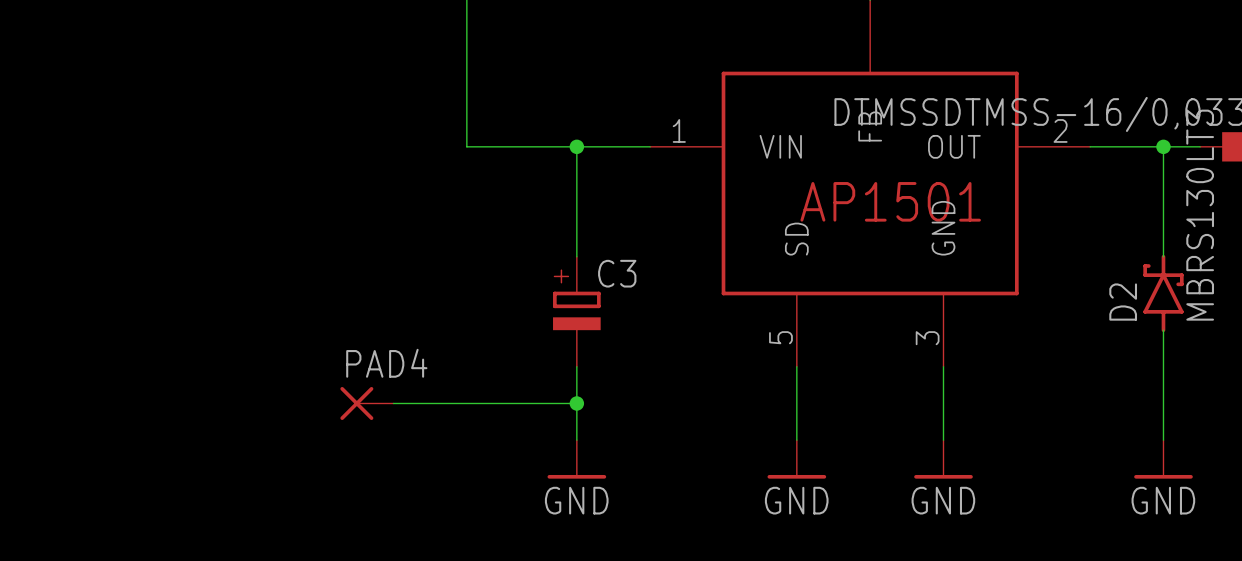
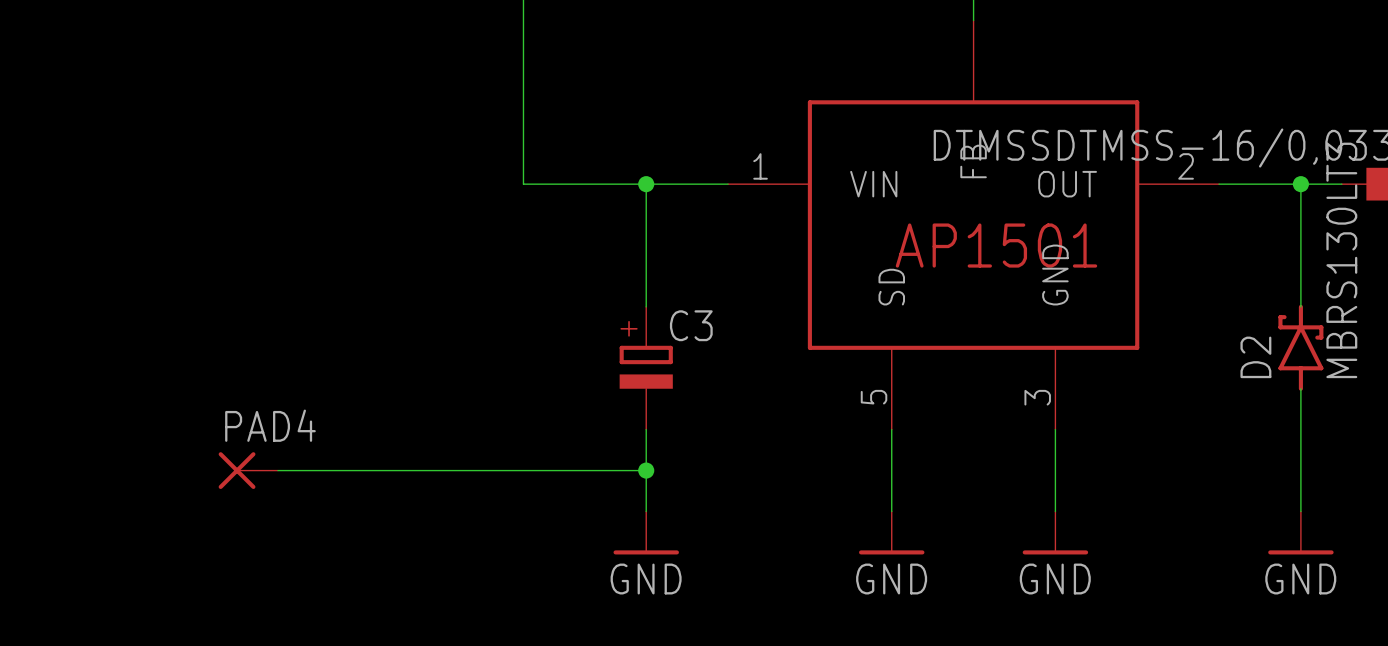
wire: none -> (277, 470) (441, 470)
PAD4 position: (366, 403) -> (248, 470)

